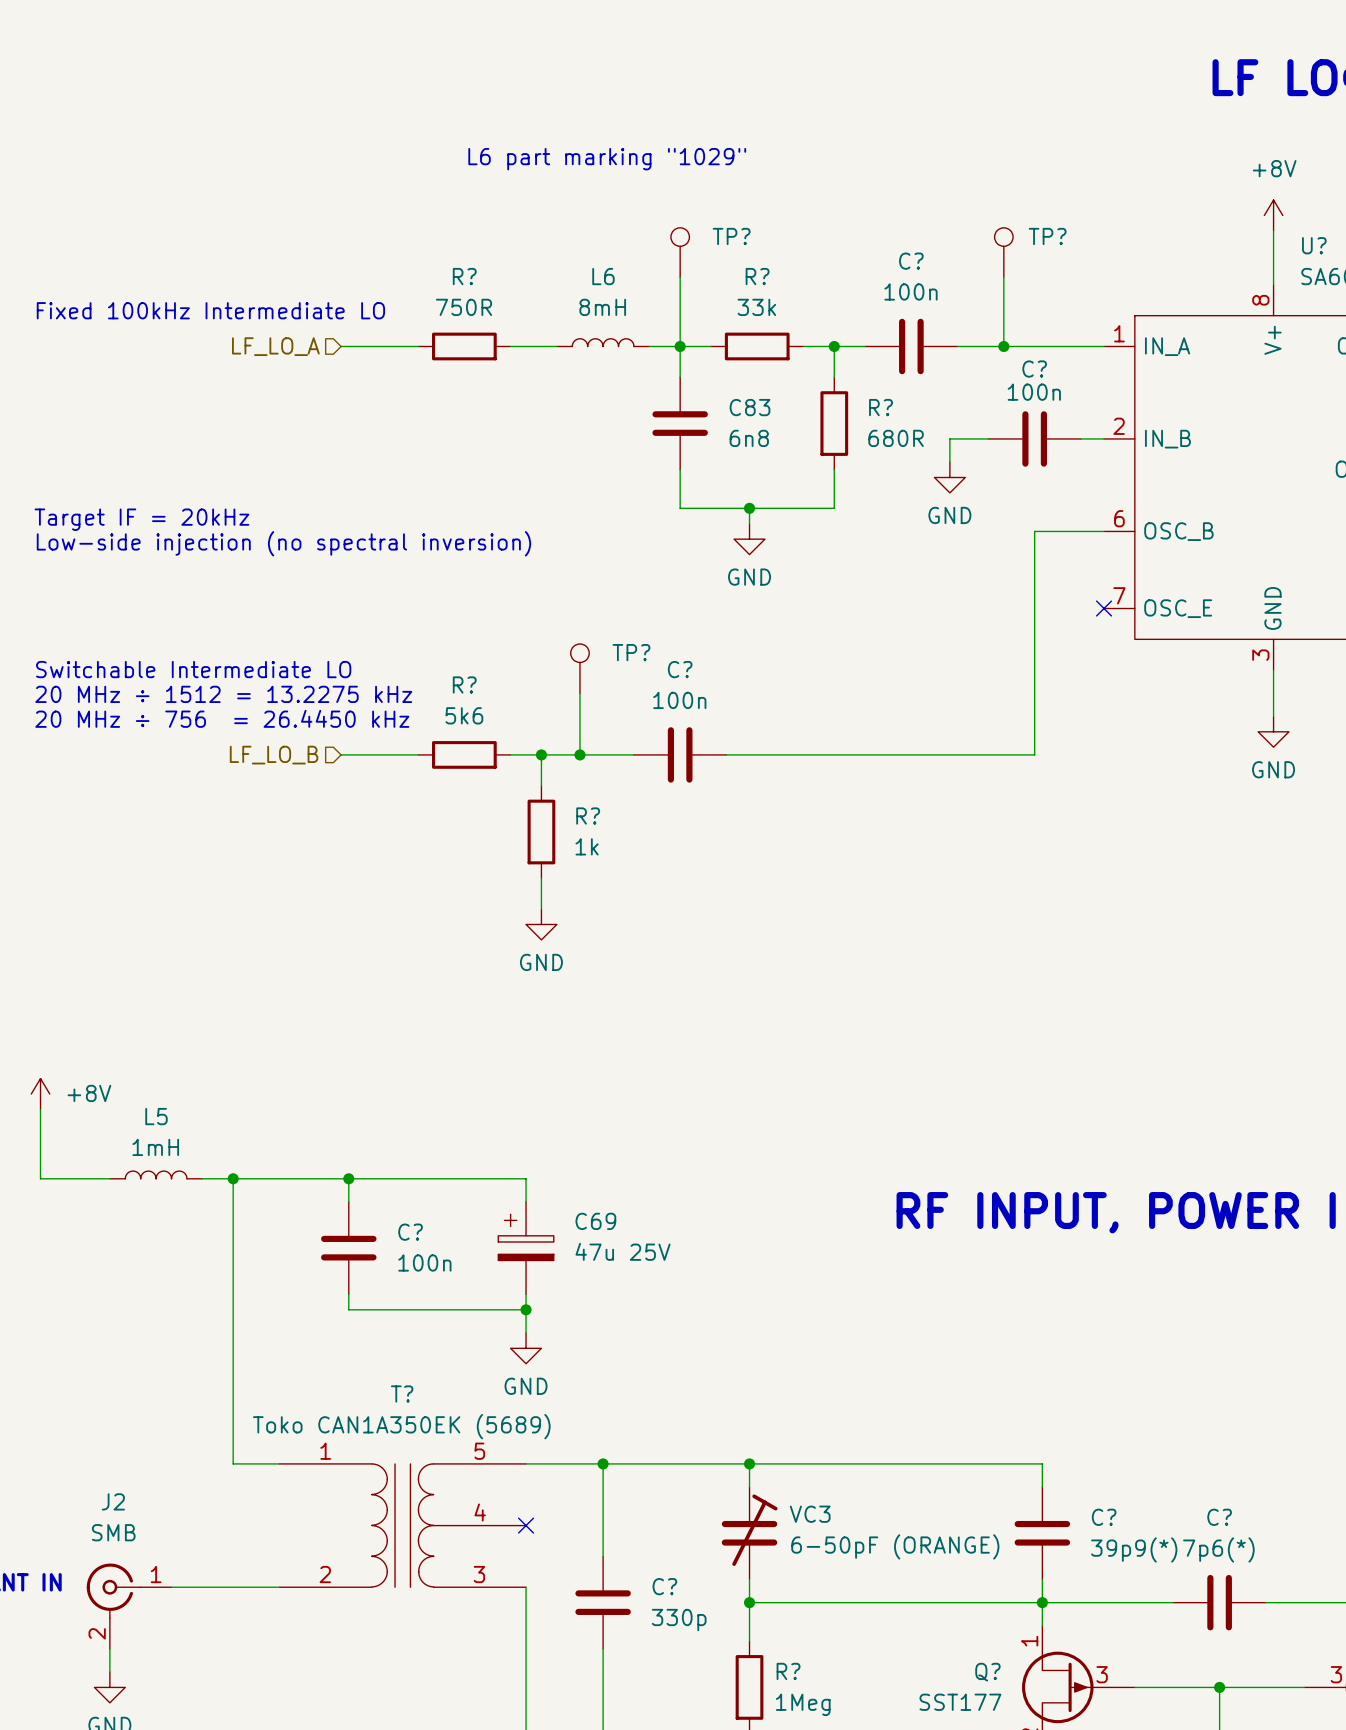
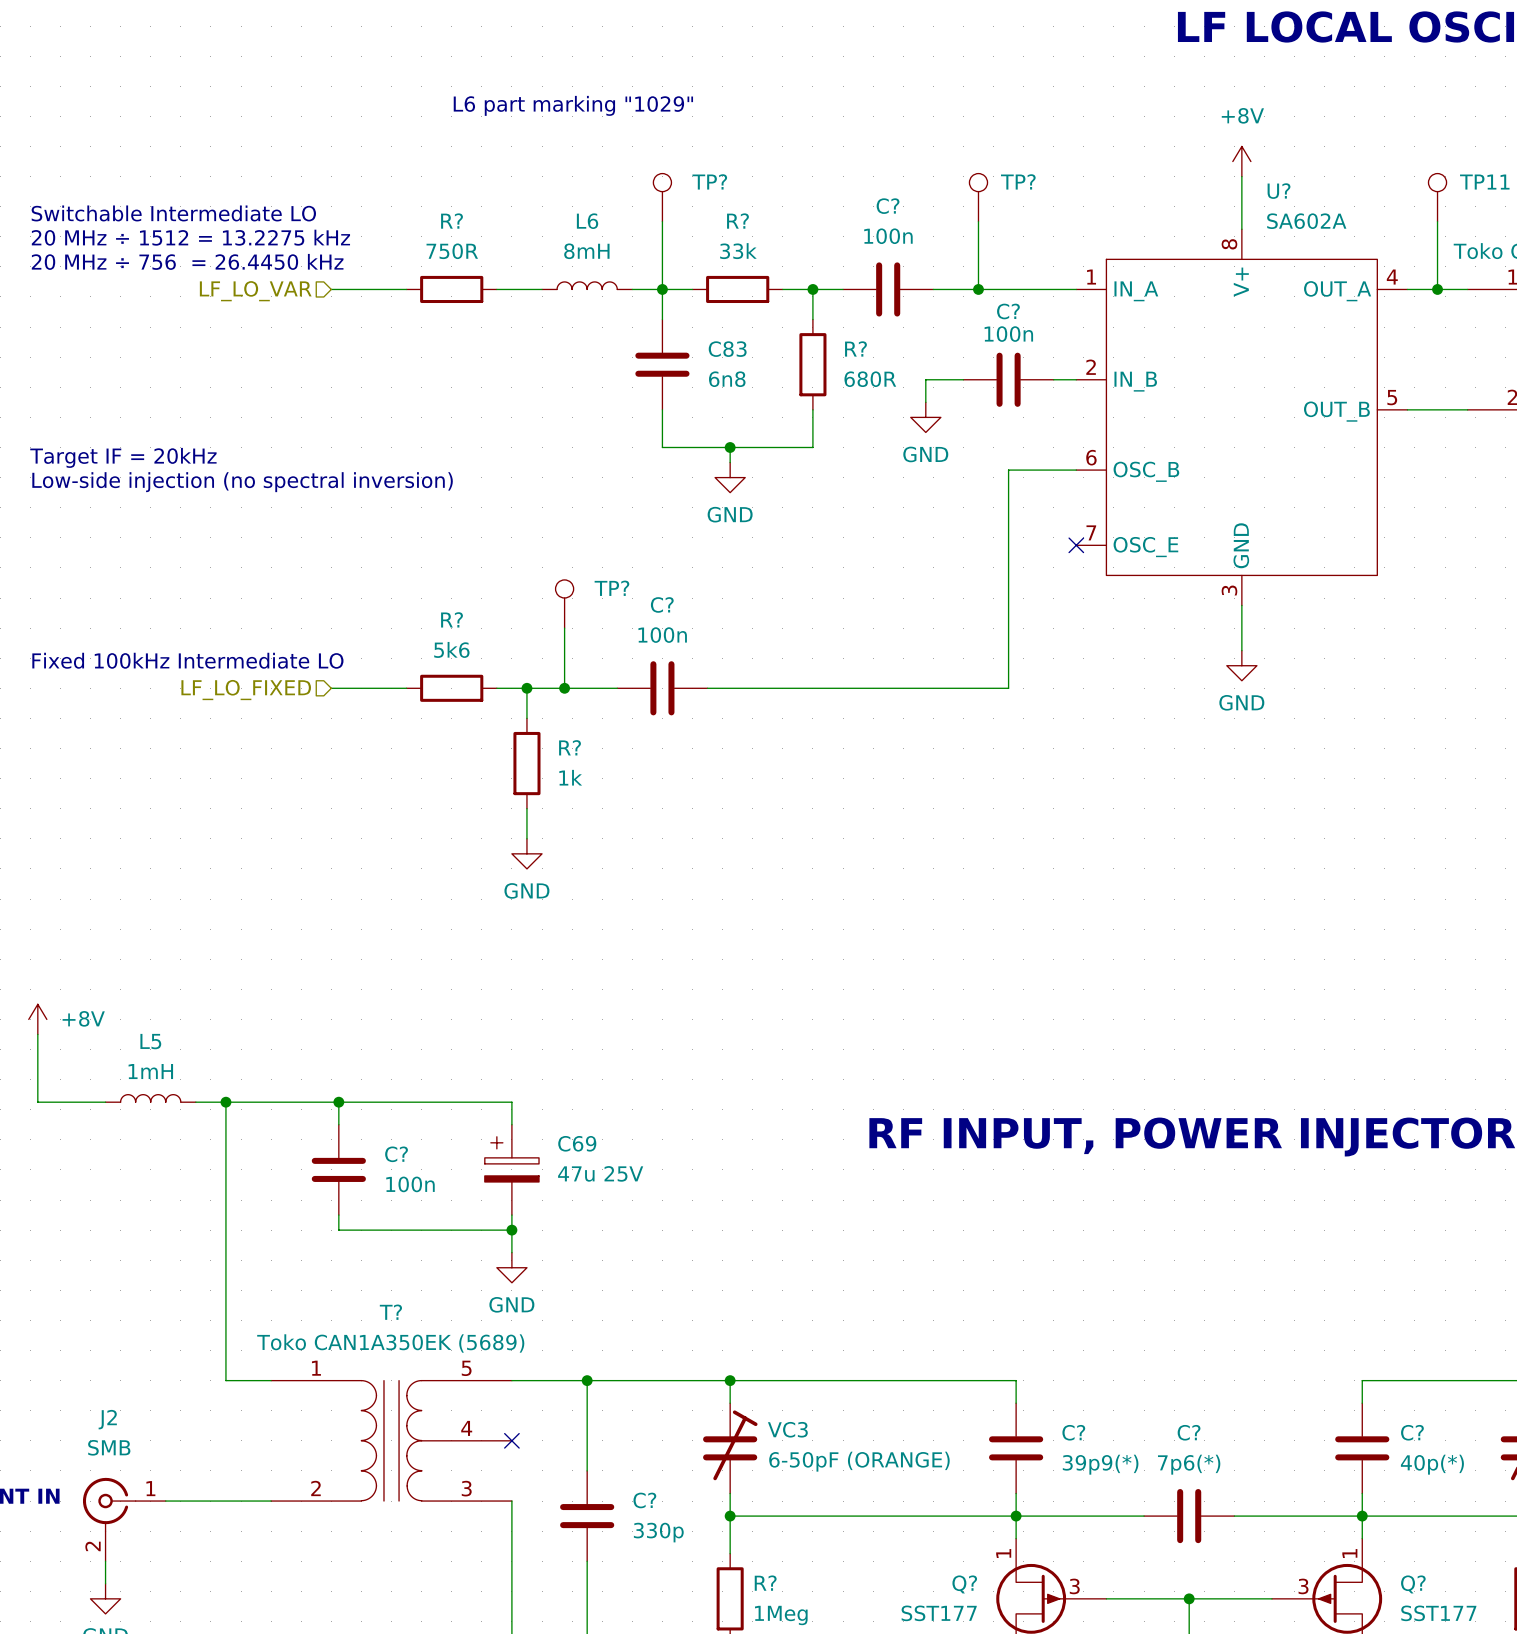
text: none -> Switchable Intermediate LO (173, 213)
text: none -> 20 MHz ÷ 1512 = 13.2275 kHz (190, 237)
text: Fixed 100kHz Intermediate LO (210, 310) -> 20 MHz ÷ 756 = 26.4450 kHz (187, 261)
hierarchical label: LF_LO_A (275, 346) -> LF_LO_VAR (255, 291)
text: Switchable Intermediate LO (193, 669) -> none
text: 20 MHz ÷ 1512 = 13.2275 kHz (223, 694) -> none
text: 20 MHz ÷ 756 = 26.4450 kHz (222, 718) -> Fixed 100kHz Intermediate LO (187, 660)
hierarchical label: LF_LO_B (274, 755) -> LF_LO_FIXED (246, 690)

